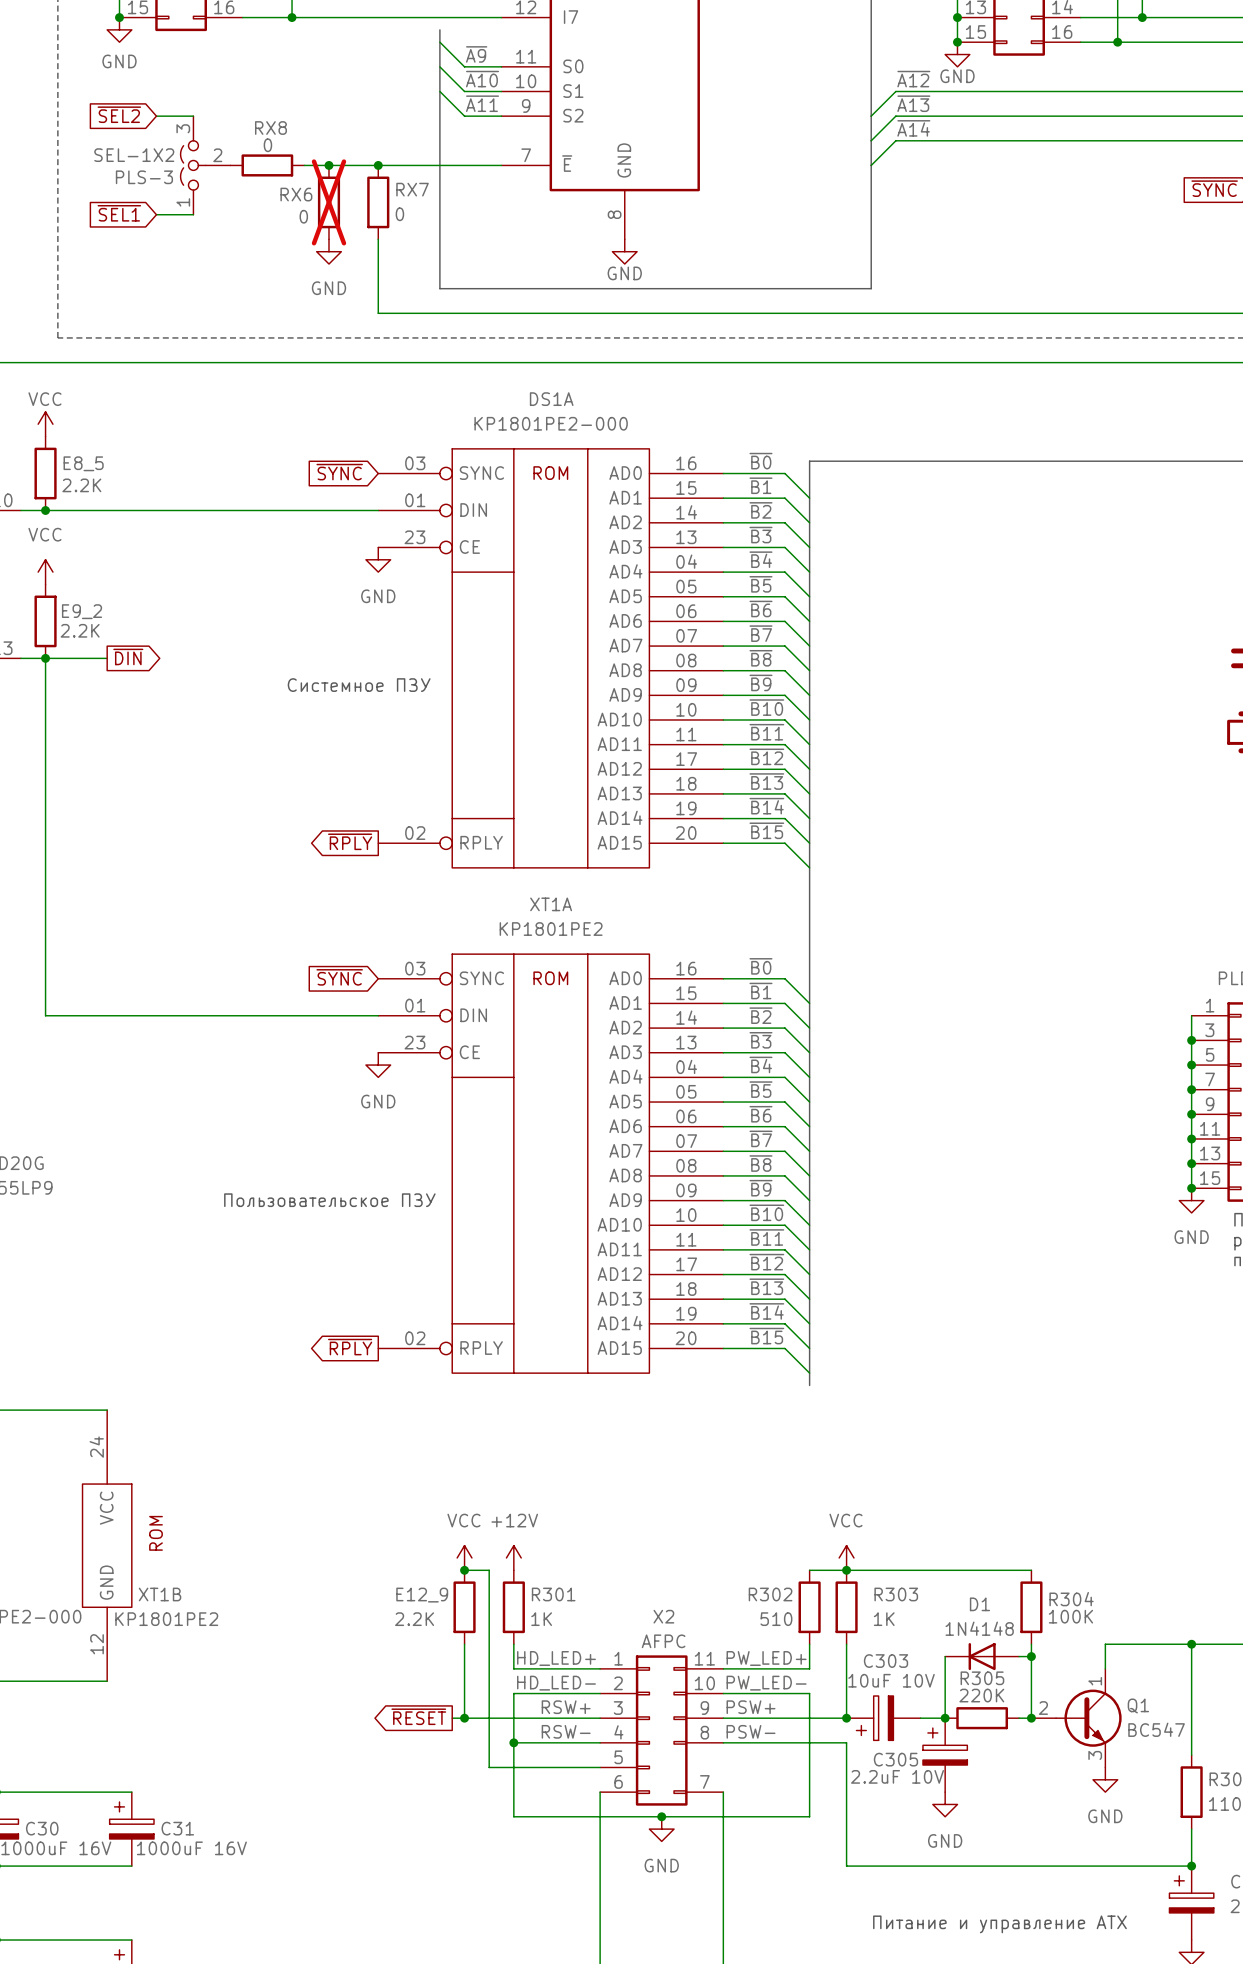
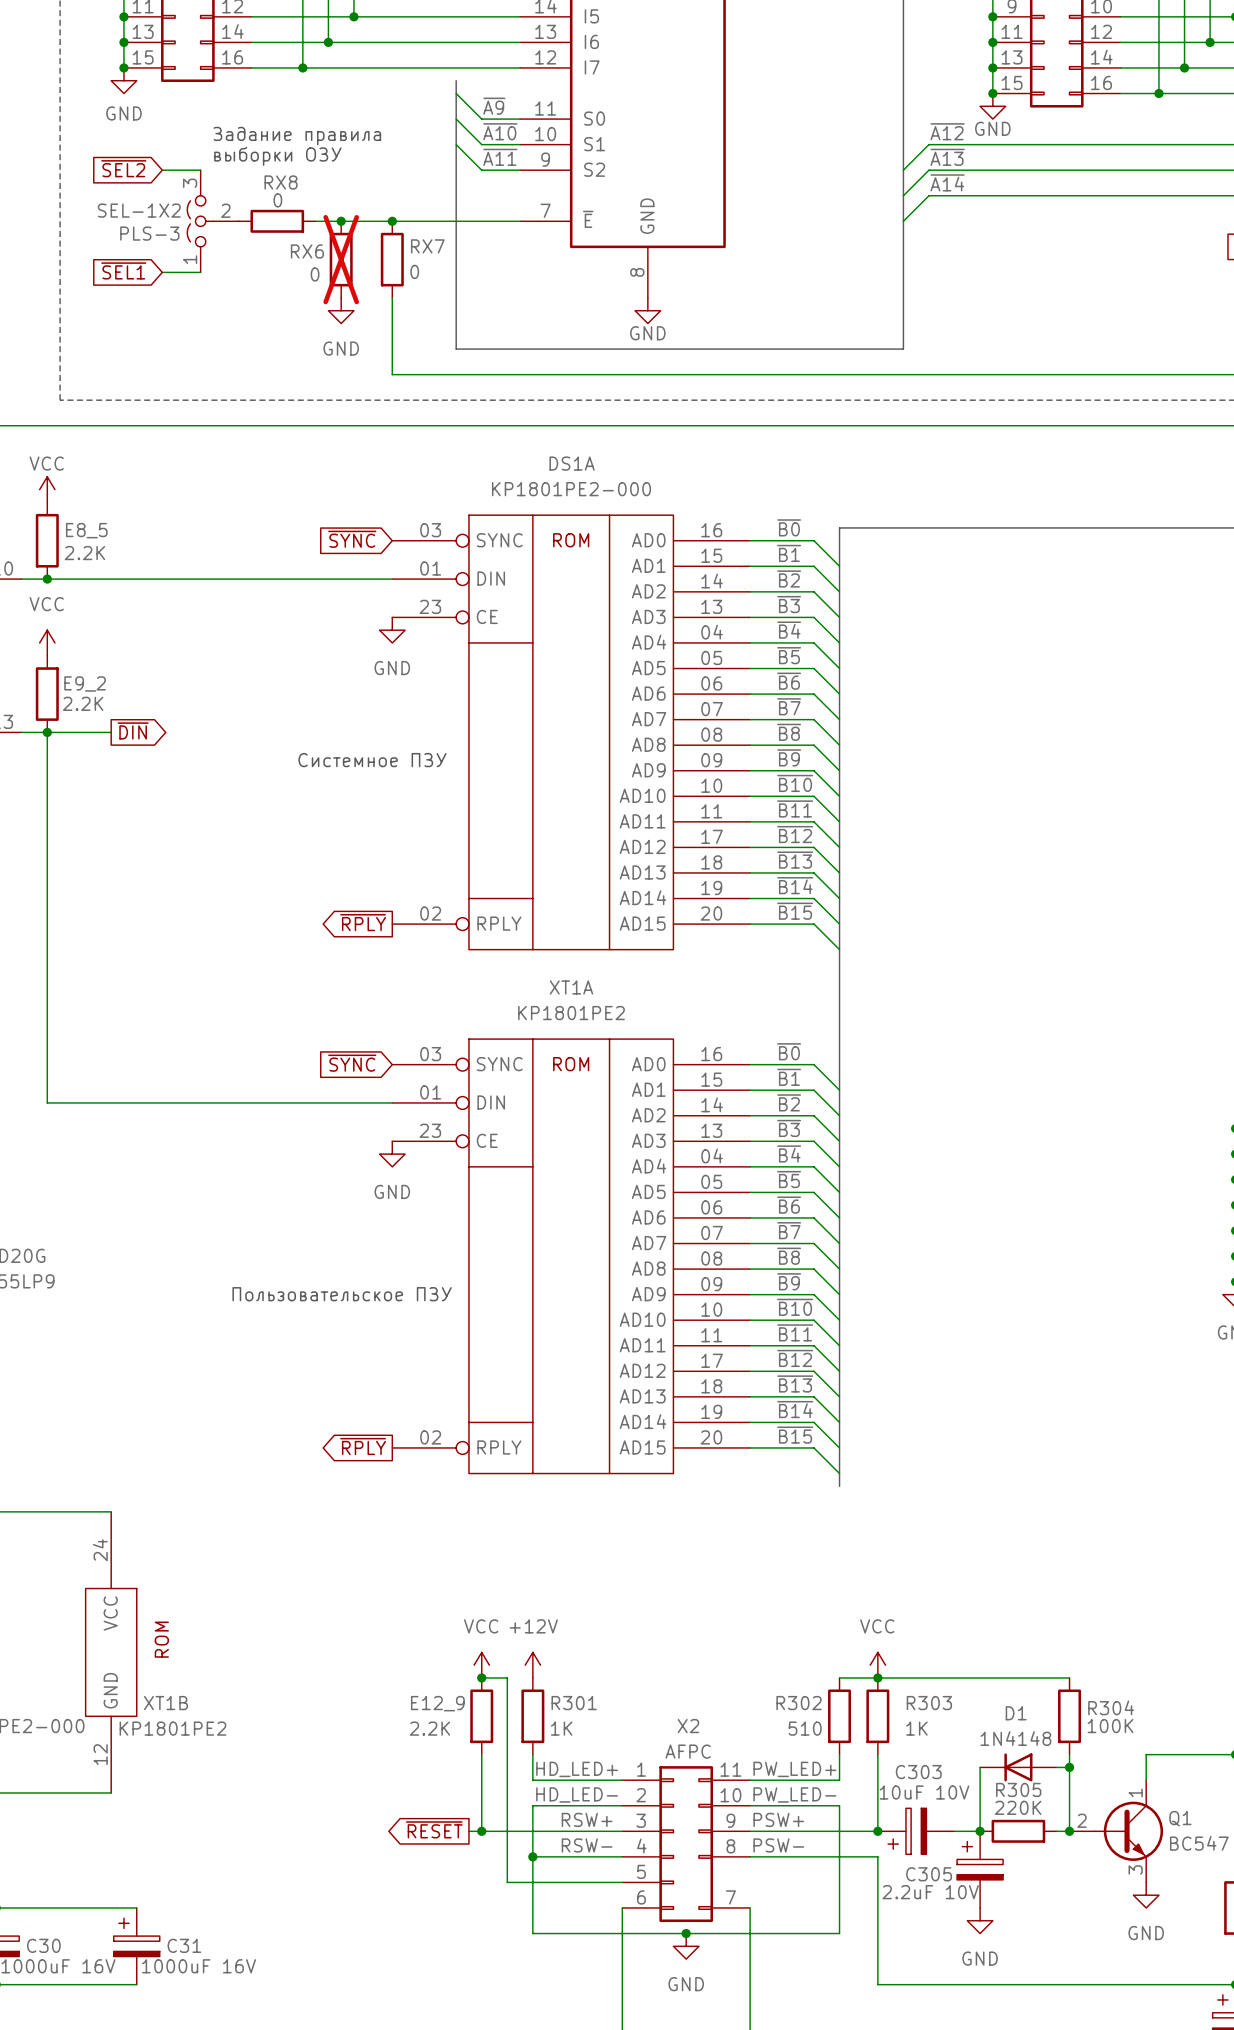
text: none -> Задание правила (297, 136)
text: none -> выборки ОЗУ (277, 156)

